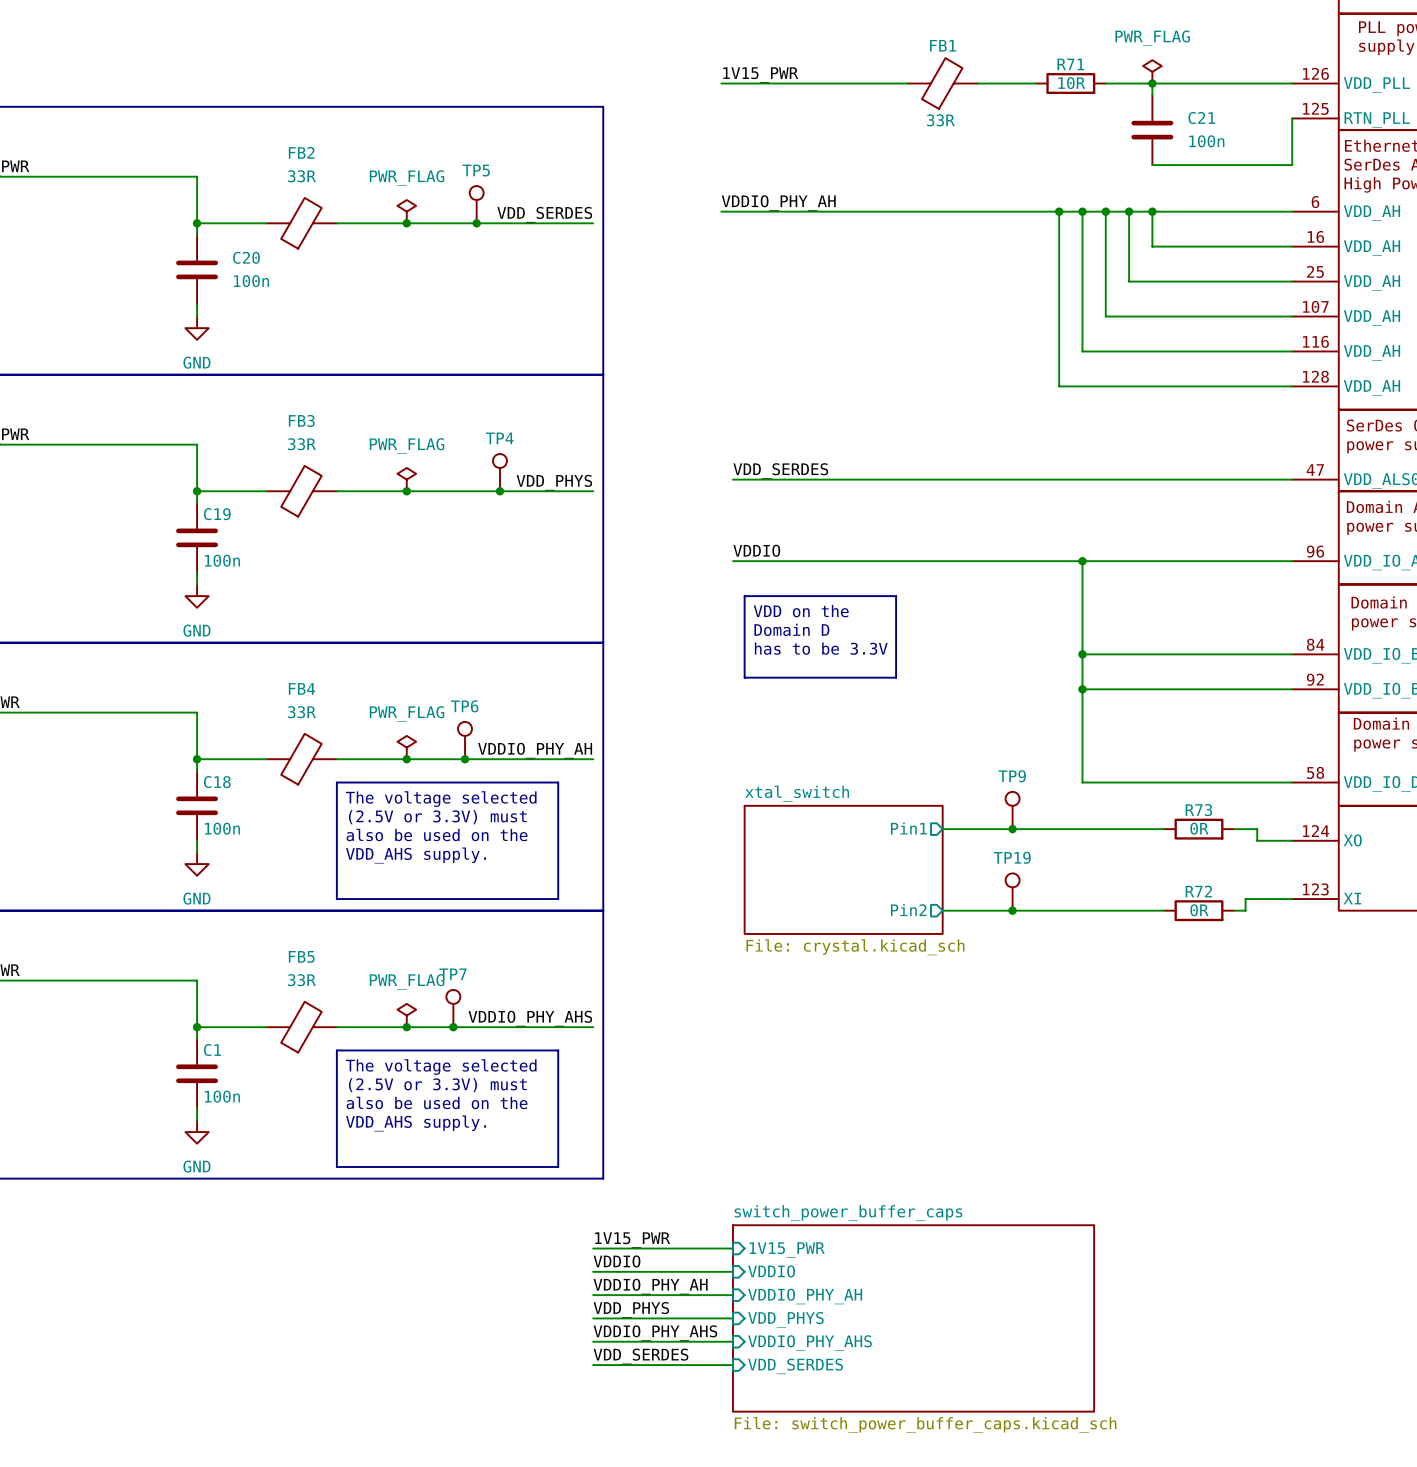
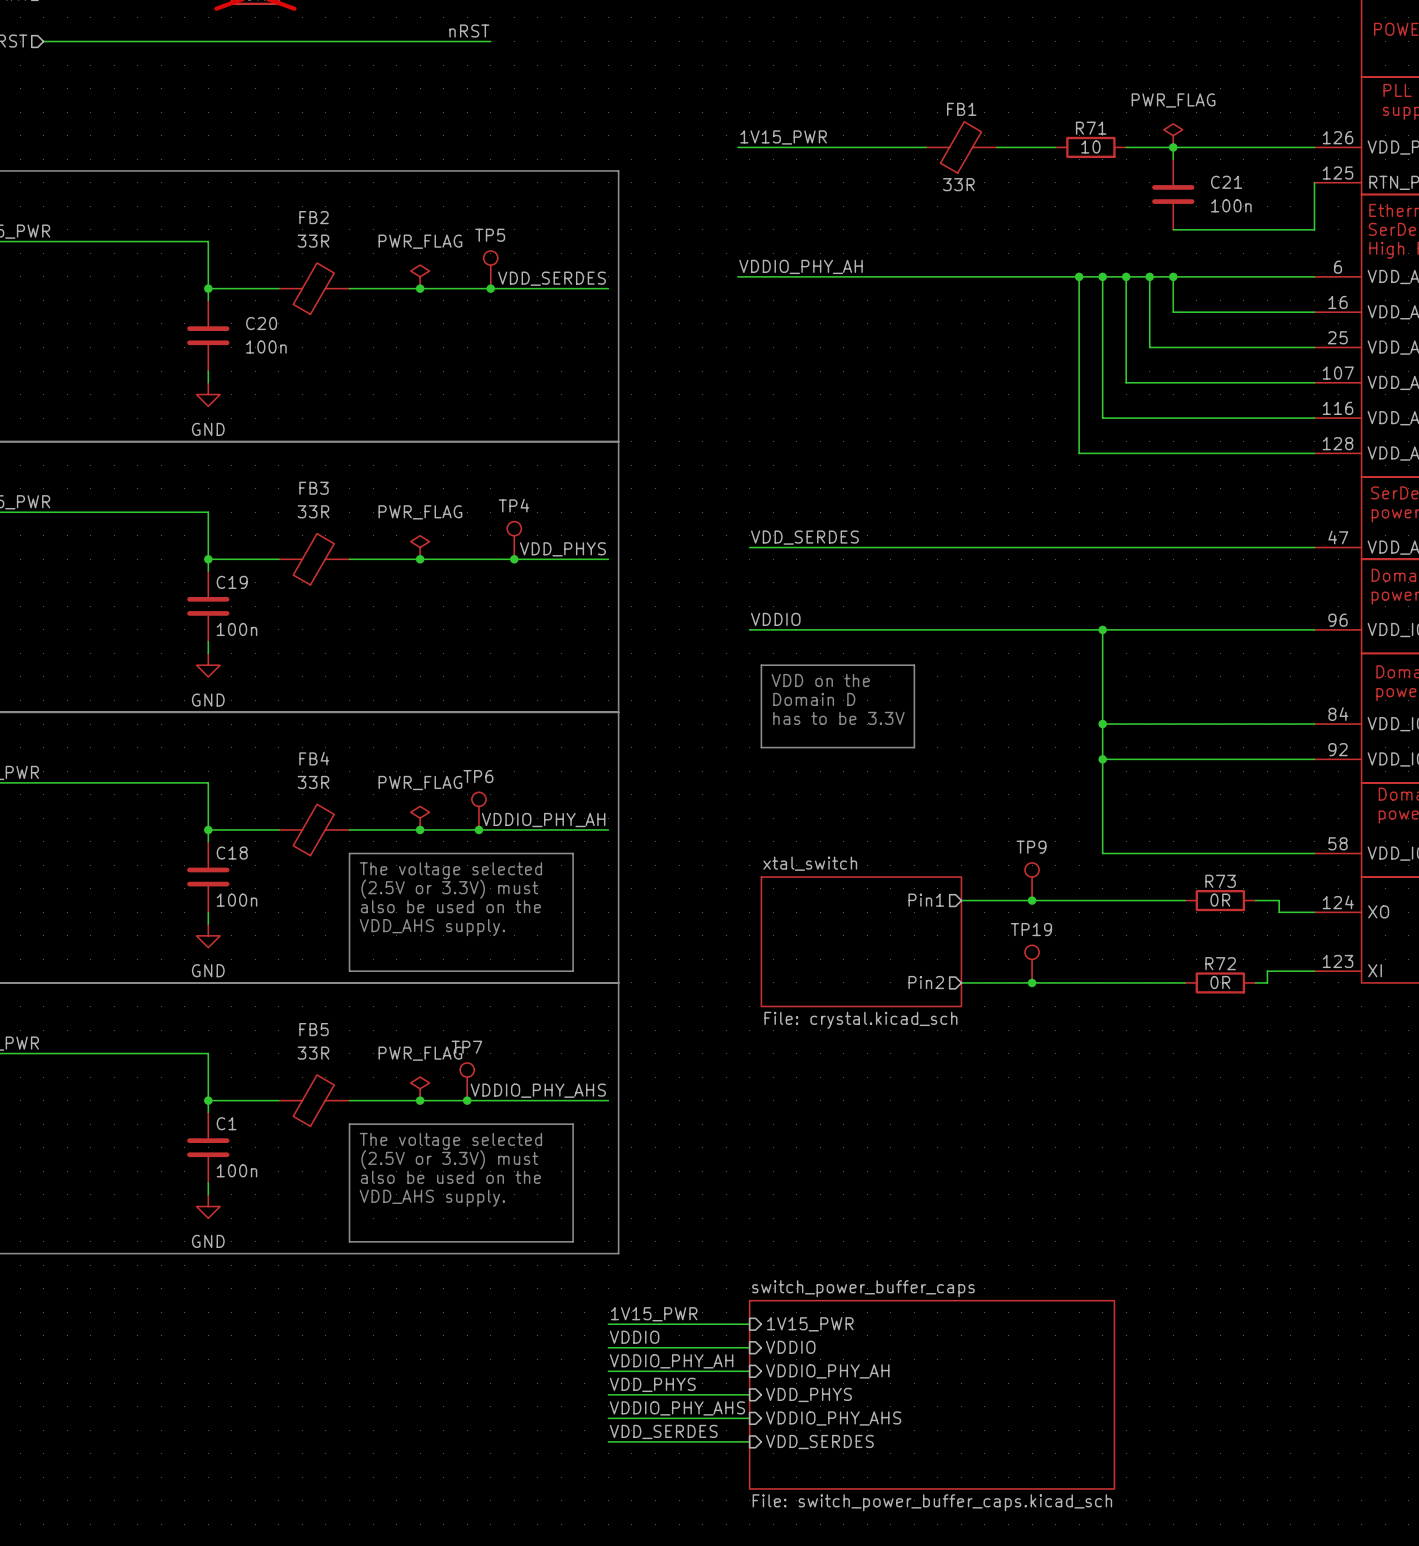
R71 value: 10R (1071, 83) -> 10 (1090, 146)

